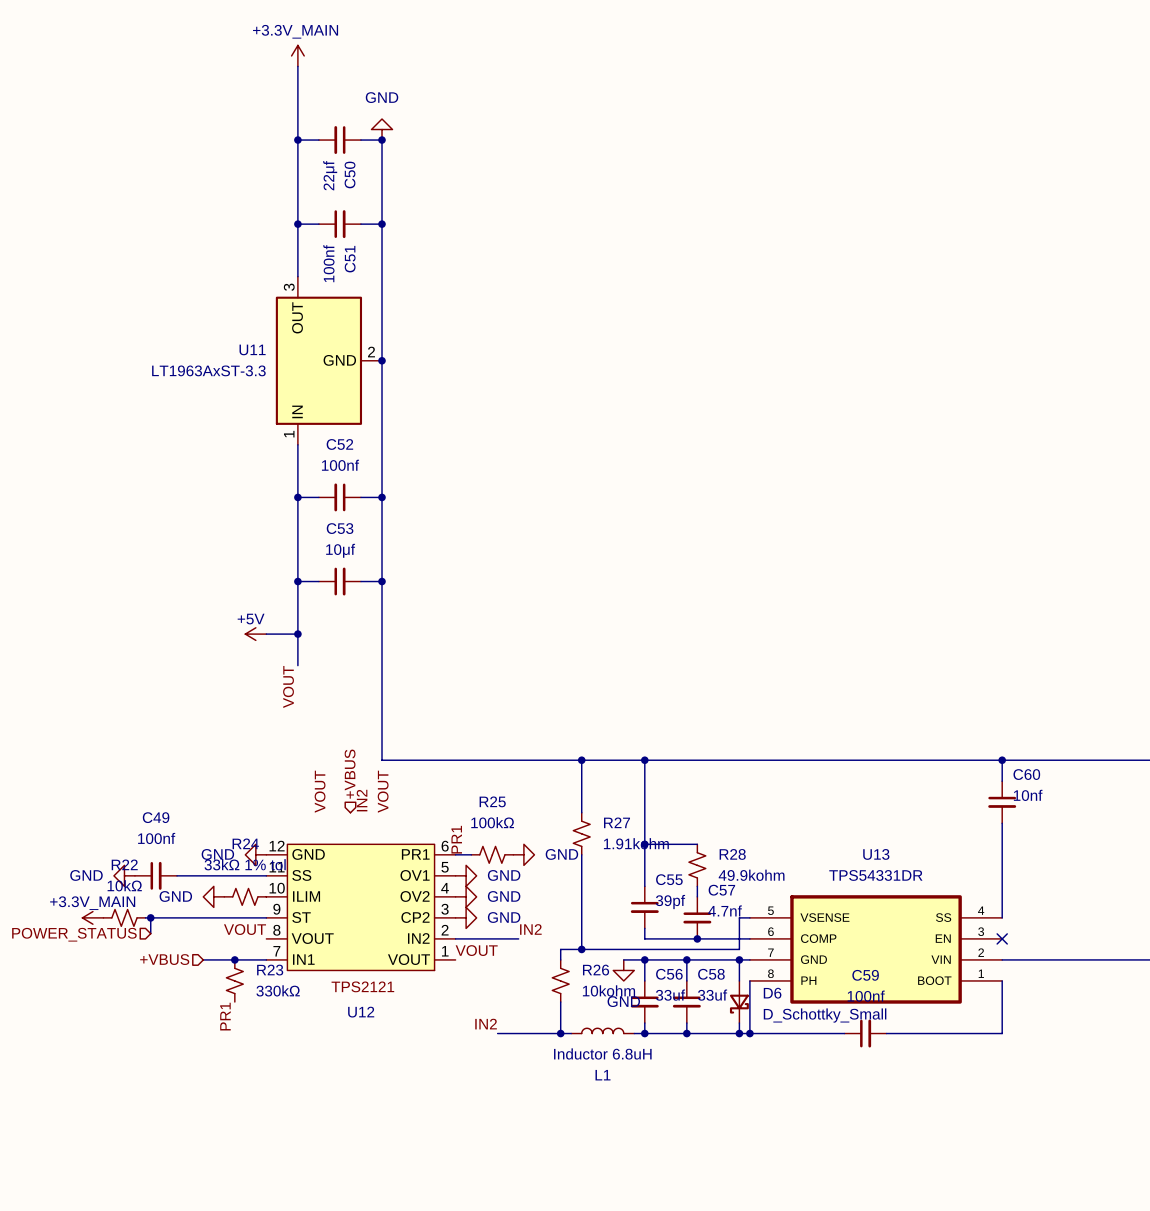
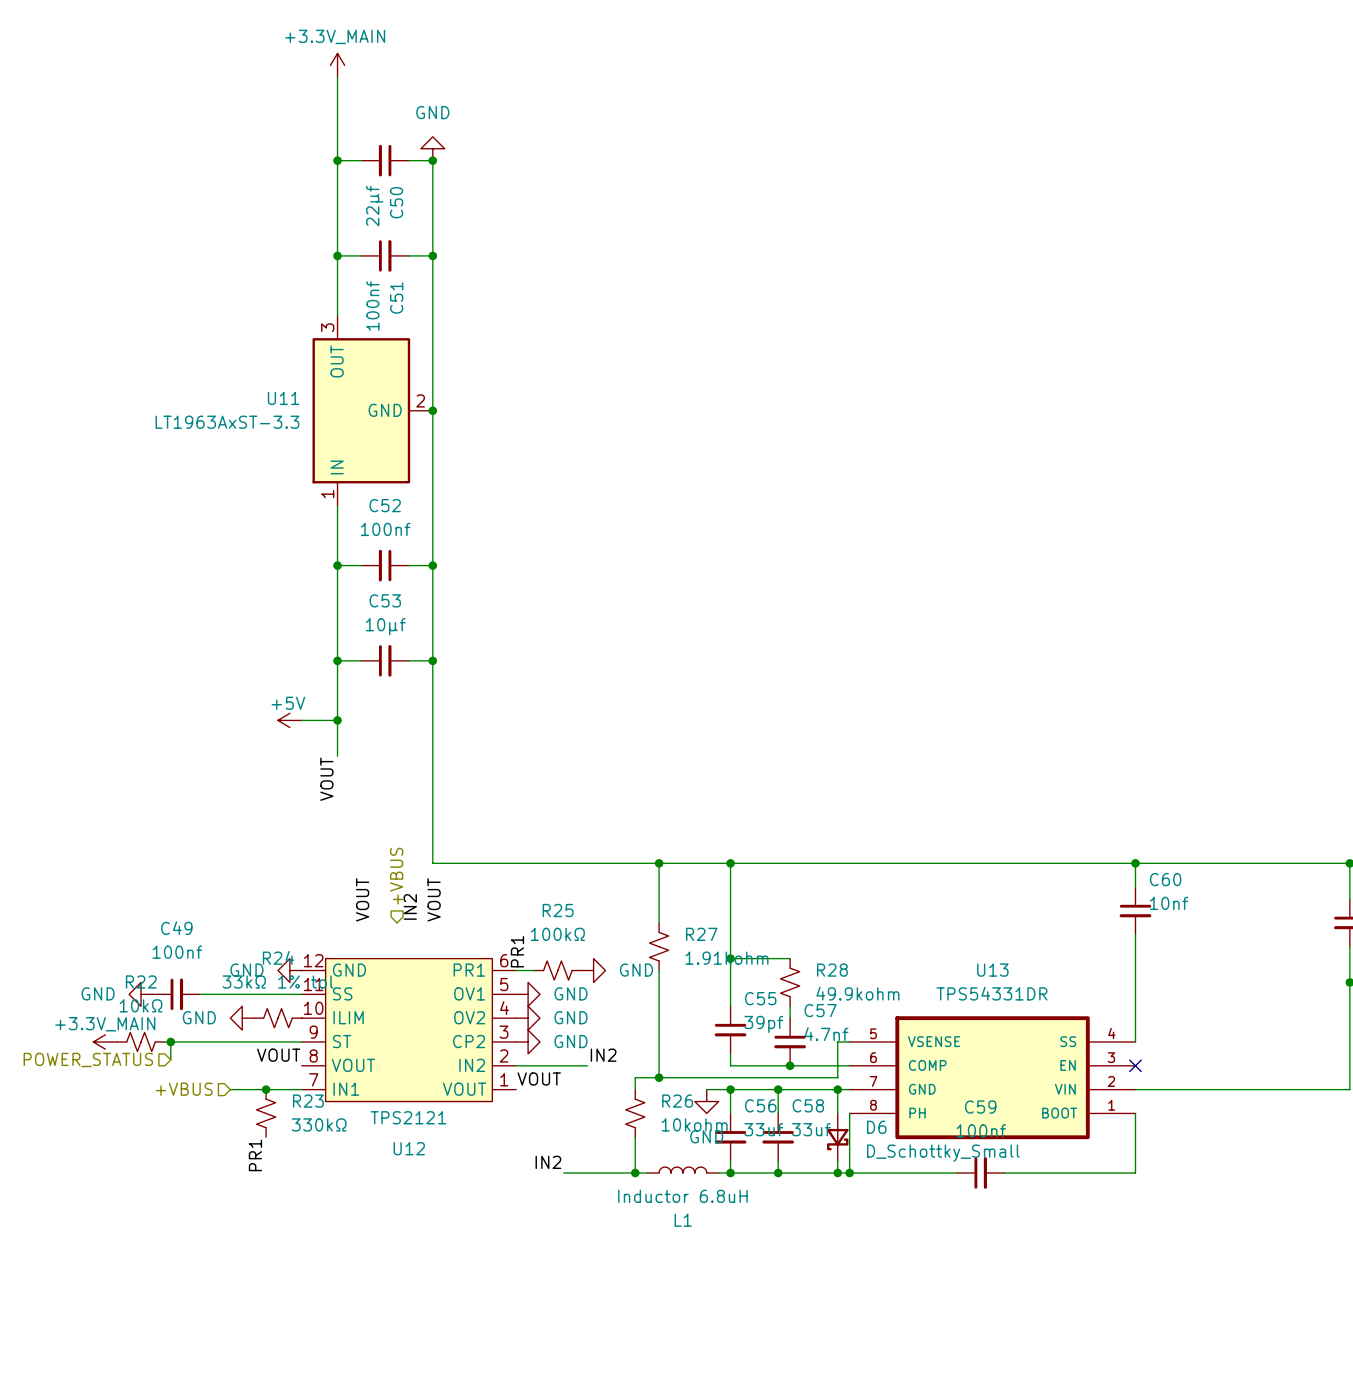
U12 value: none -> TPS2121 (408, 1117)
U12 text: TPS2121 (362, 986) -> none

